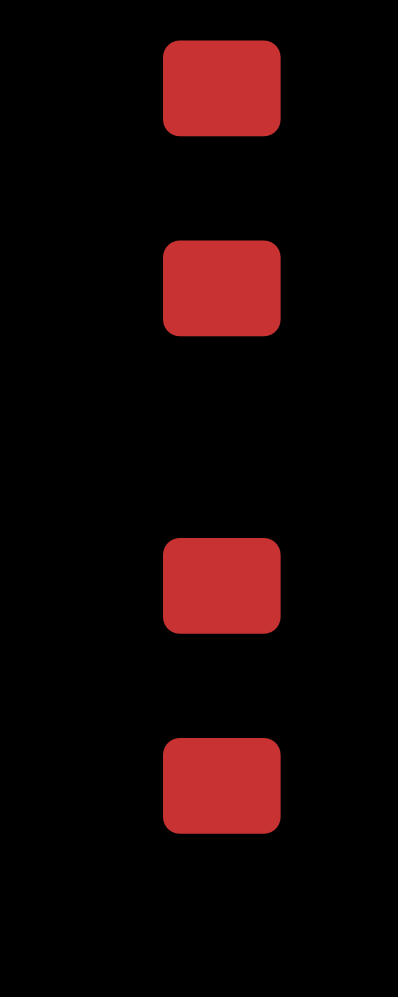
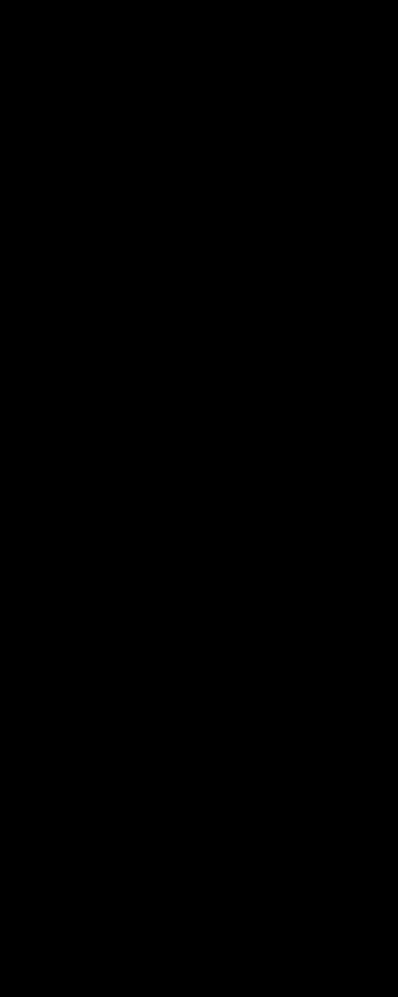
part: (221, 188) -> none
part: (221, 685) -> none

